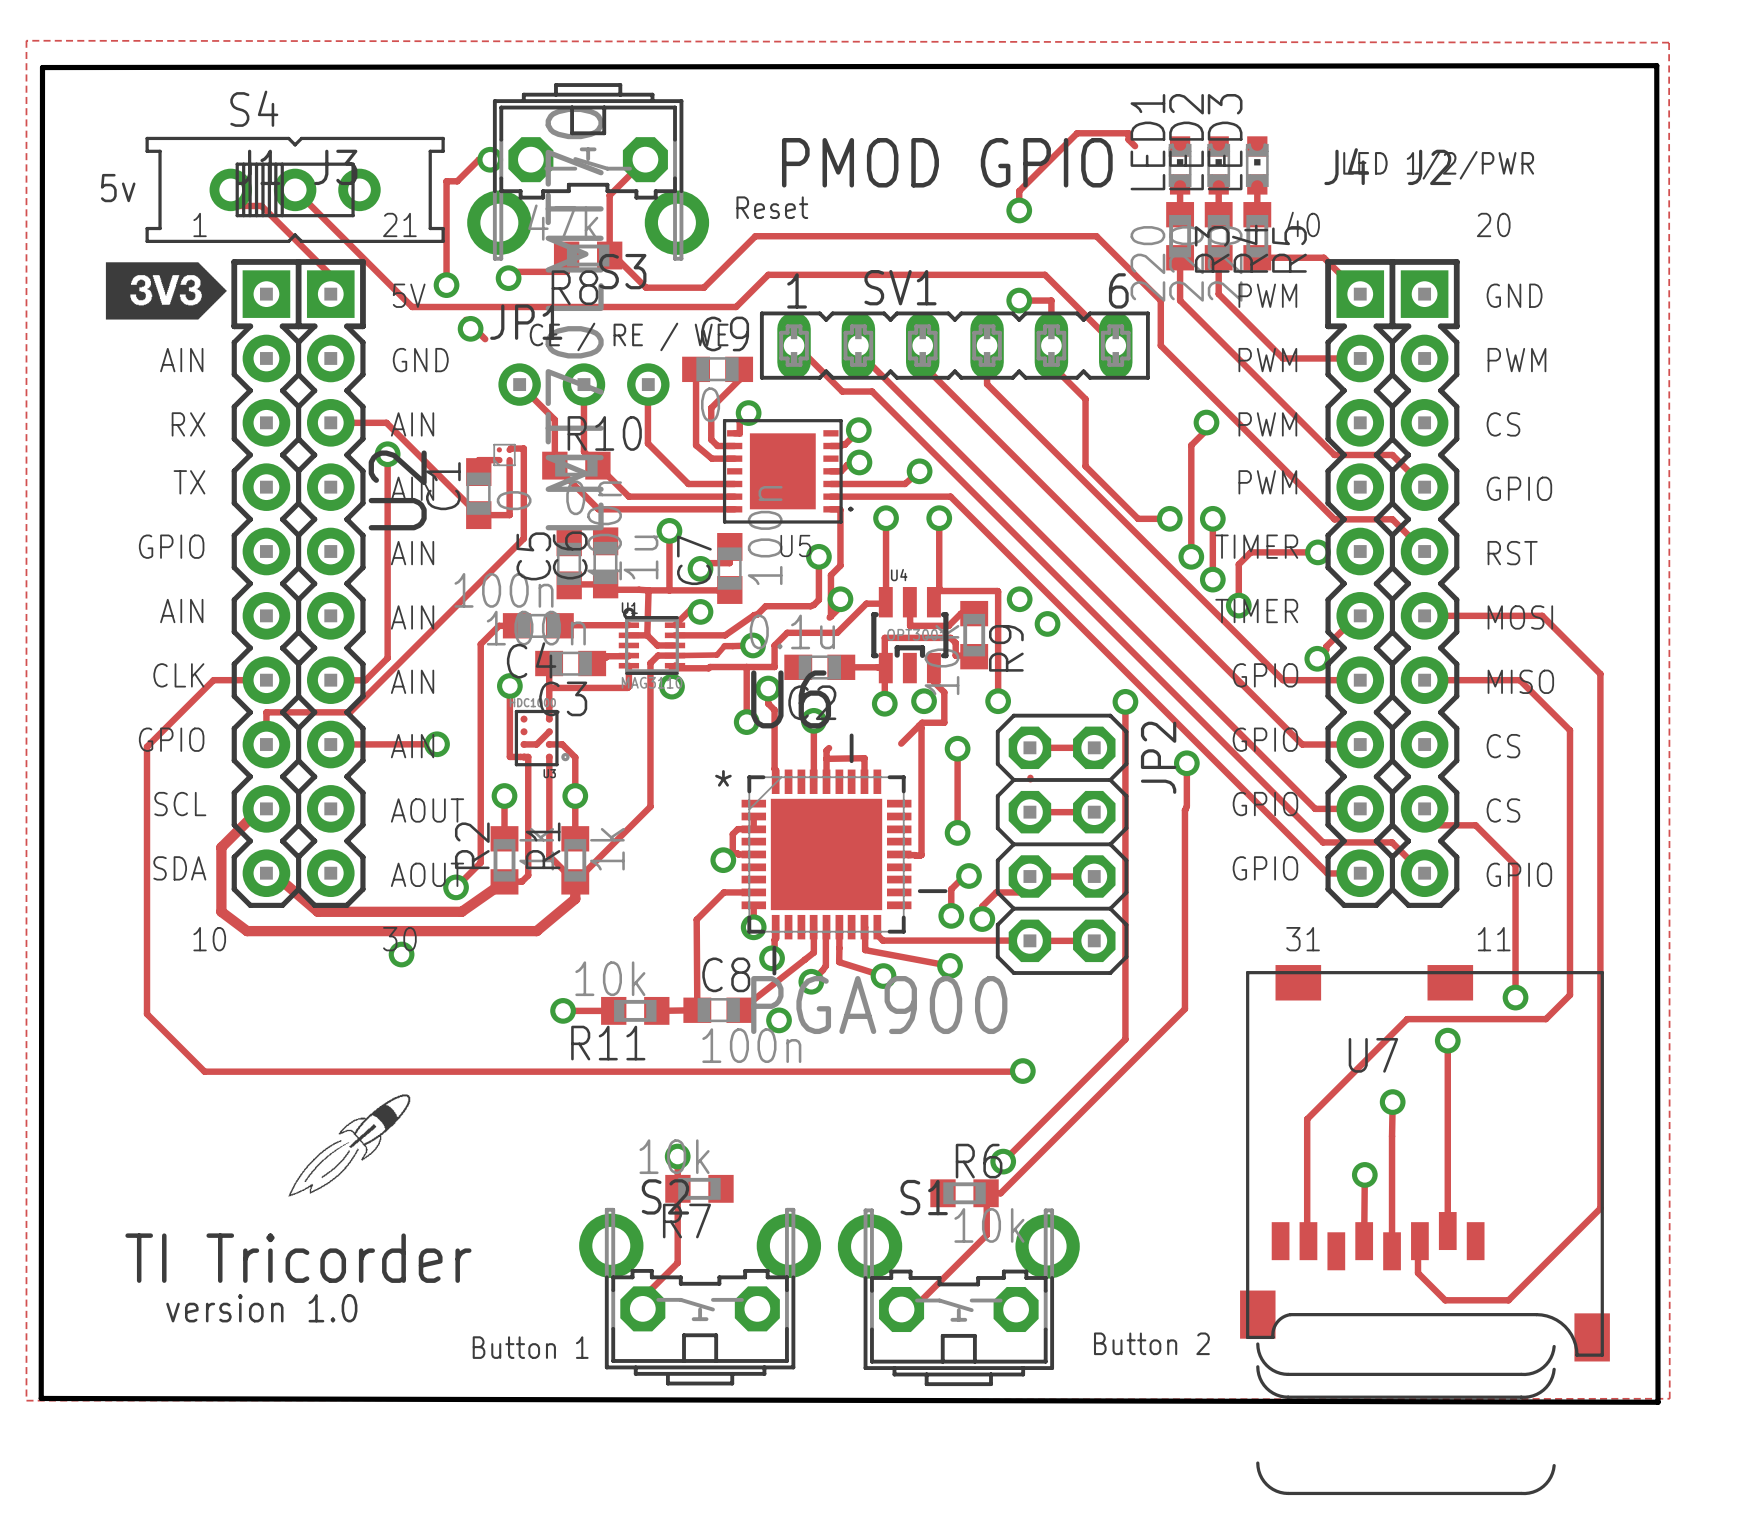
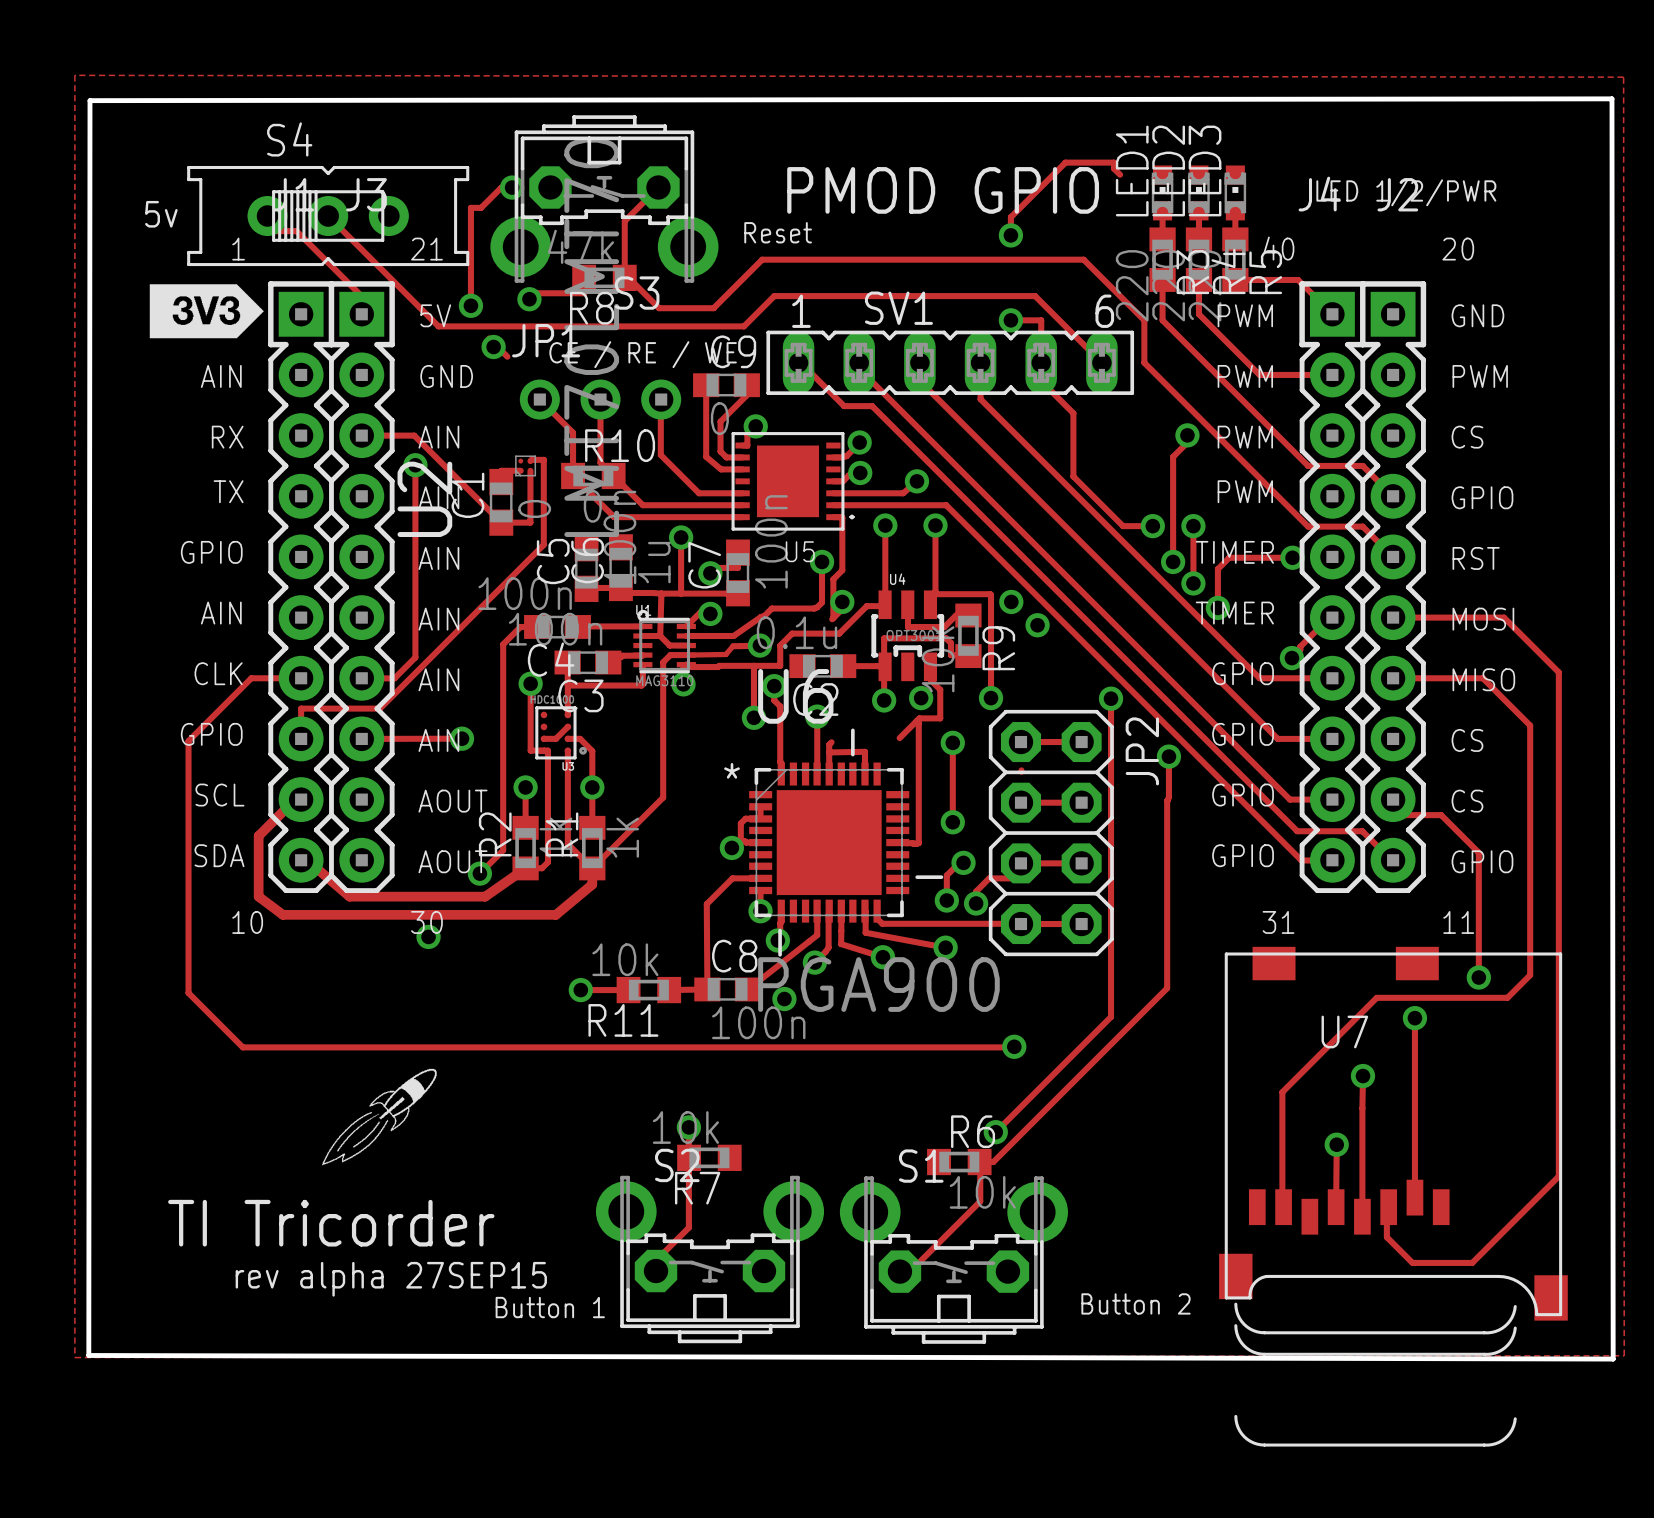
text: version 1.0 (261, 1308) -> none
text: none -> rev alpha 27SEP15 (391, 1279)

